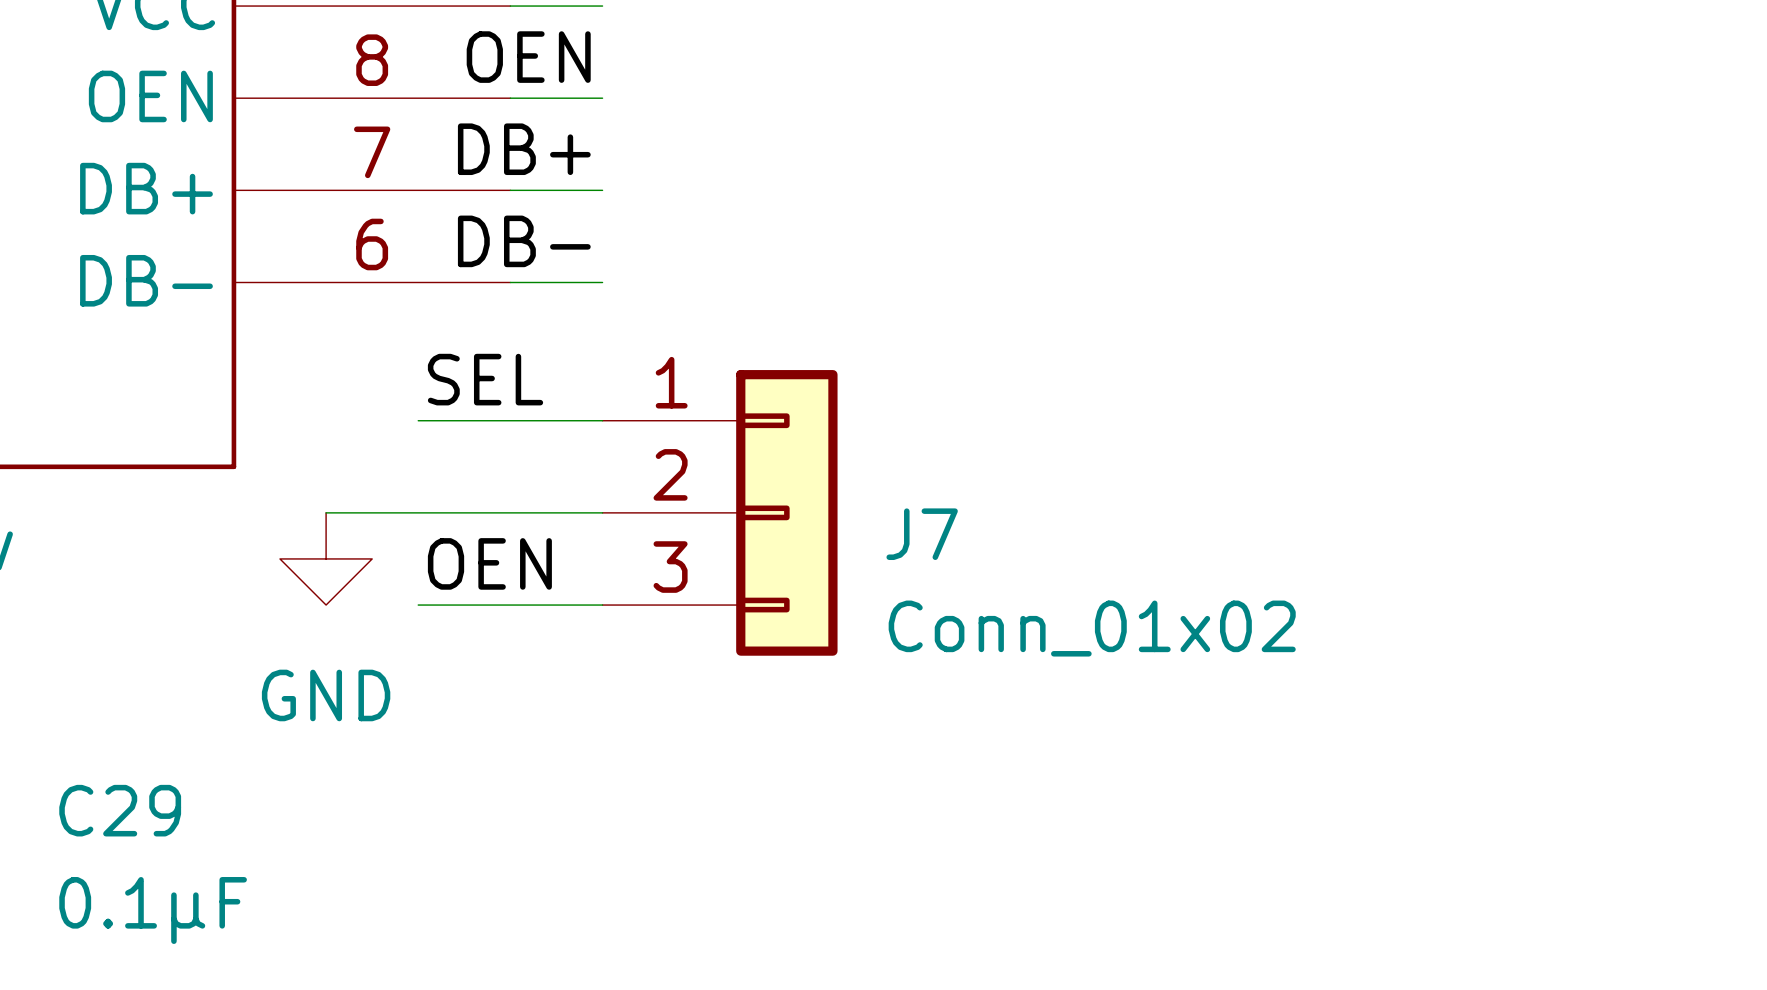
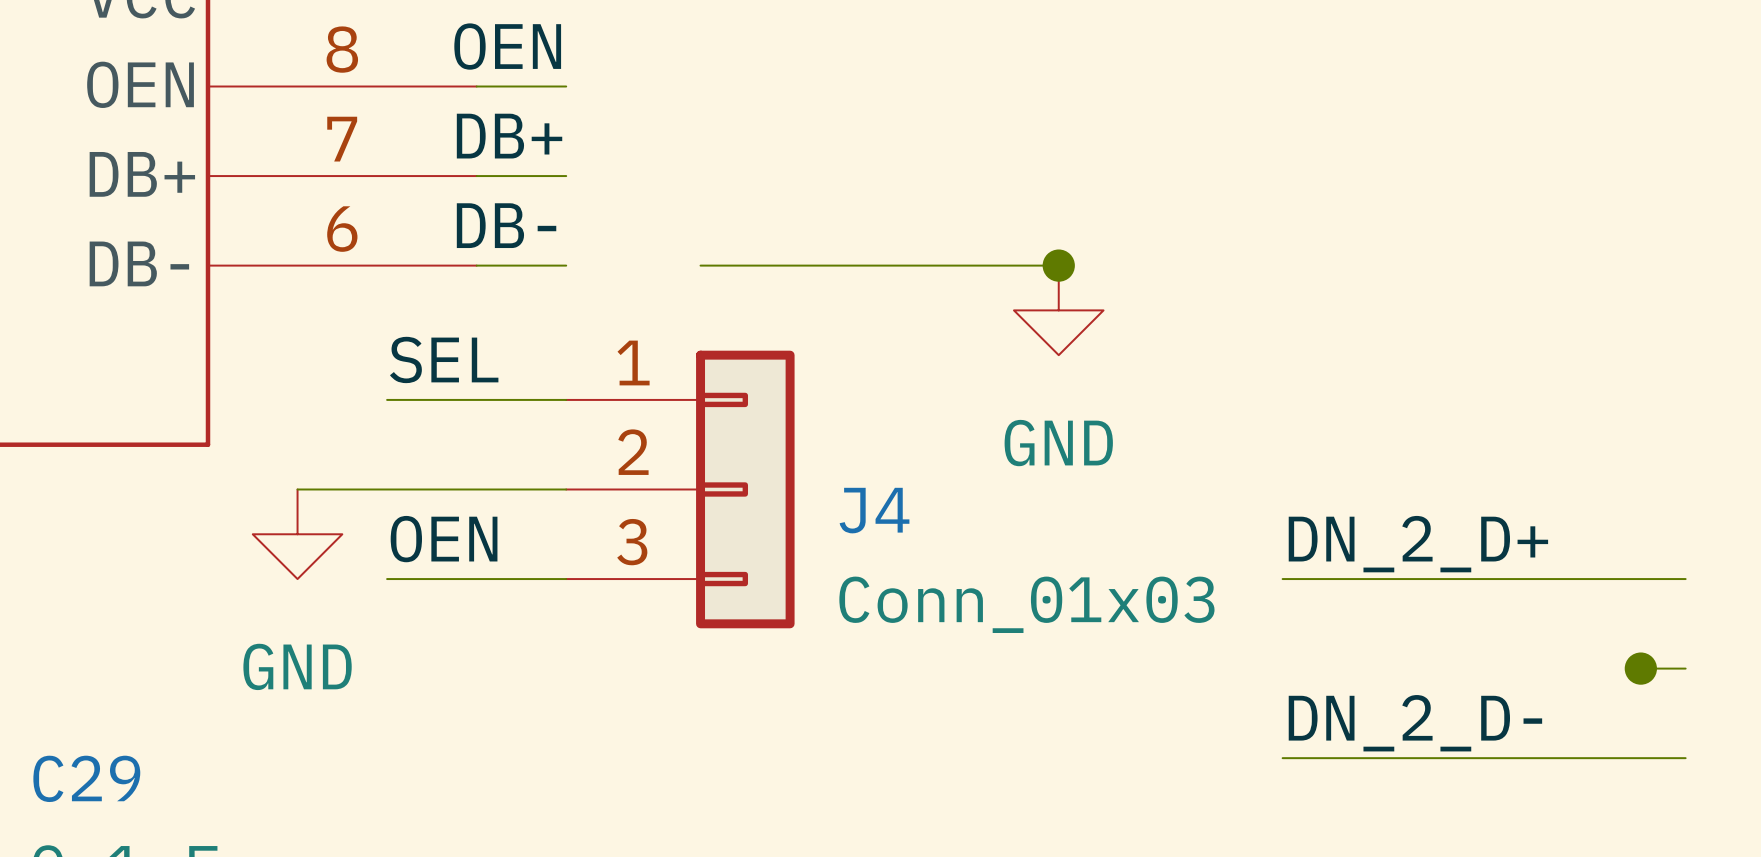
wire: none -> (700, 265) (1058, 265)
junction: none -> (1058, 265)
power symbol: none -> GND (1058, 310)
J7 name: J7 (922, 534) -> J4 (874, 510)
label: none -> DN_2_D+ (1418, 544)
wire: none -> (1282, 579) (1685, 579)
J7 value: Conn_01x02 (1092, 628) -> Conn_01x03 (1026, 604)
wire: none -> (1640, 668) (1685, 668)
junction: none -> (1640, 668)
label: none -> DN_2_D- (1415, 723)
wire: none -> (1282, 758) (1685, 758)

